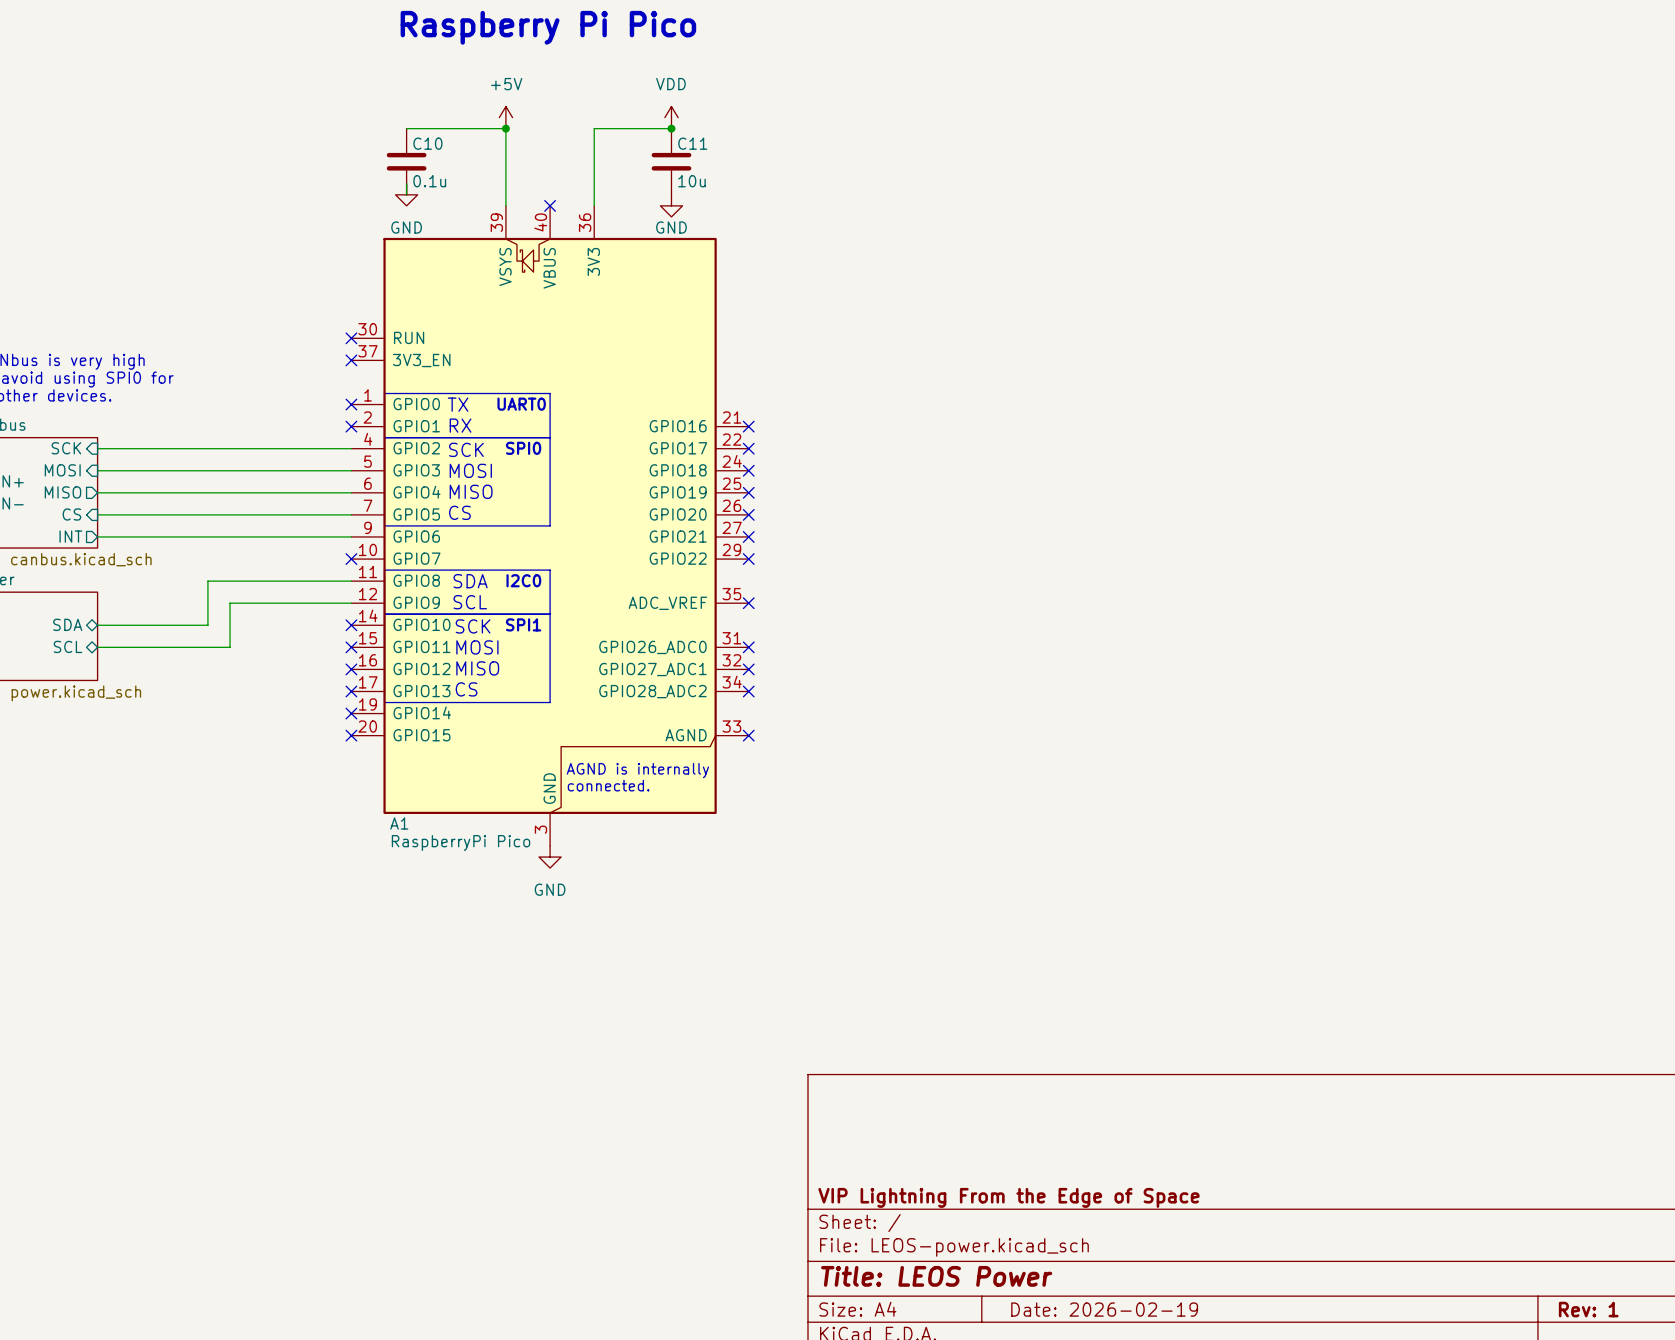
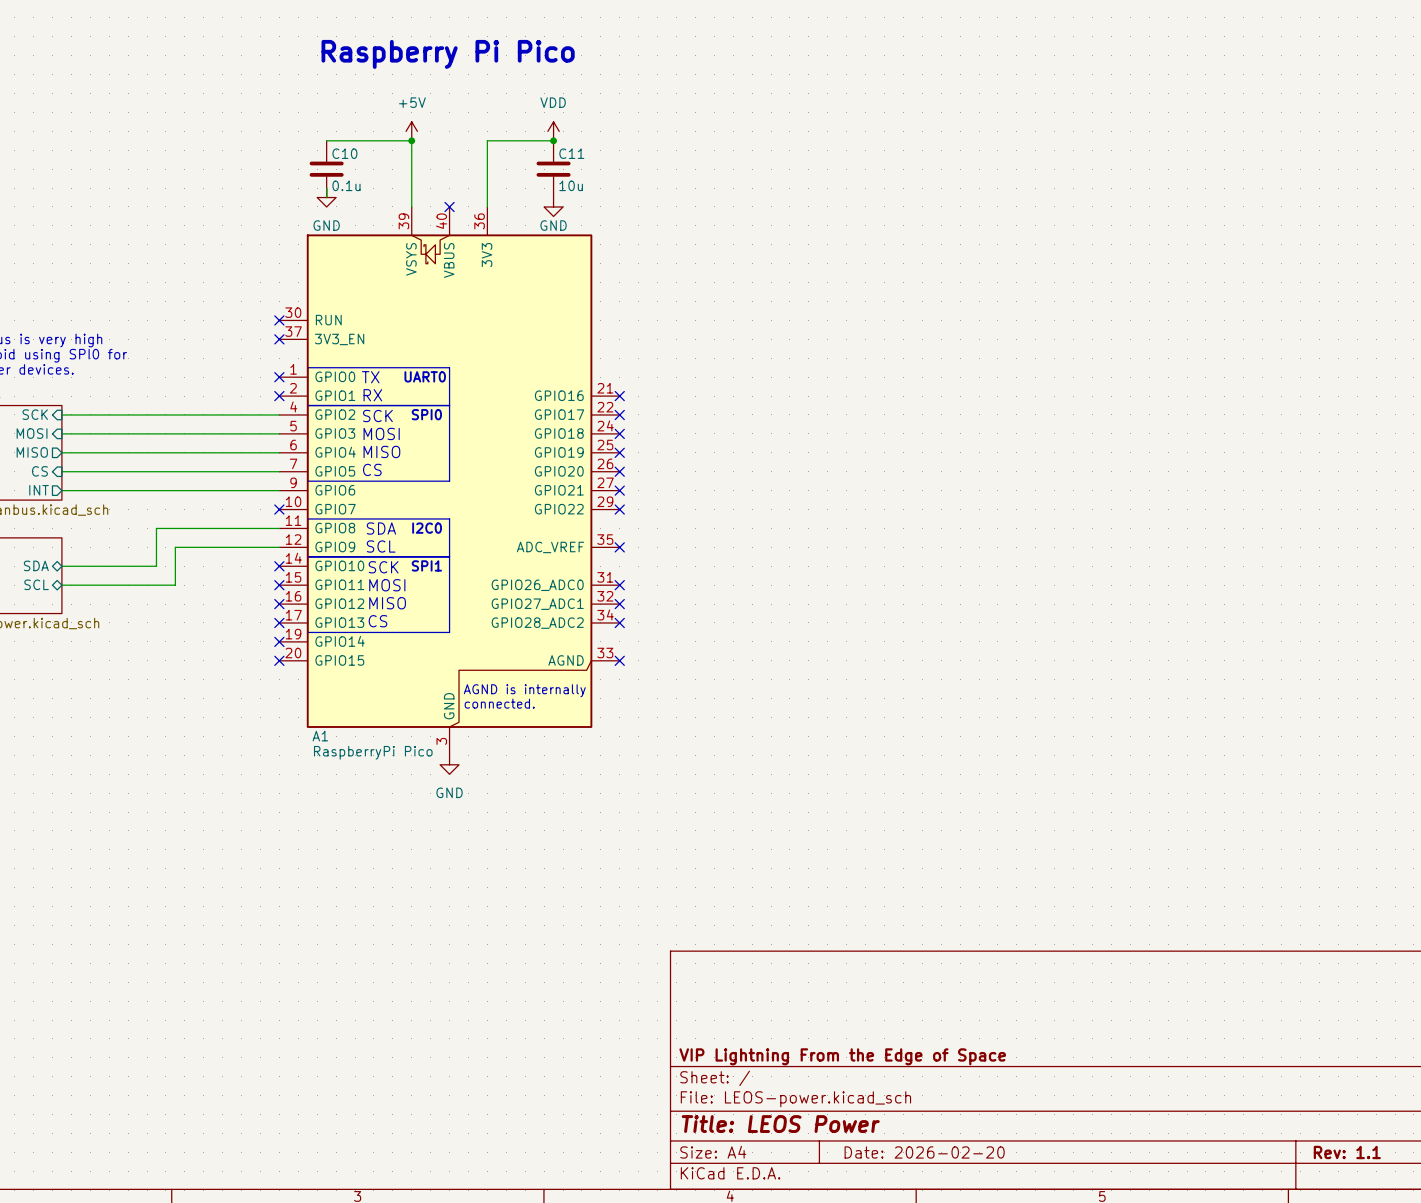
title block: Date: 2026-02-19 (1104, 1309) -> Date: 2026-02-20 (924, 1152)
title block: Rev: 1 (1588, 1309) -> Rev: 1.1 (1347, 1152)

